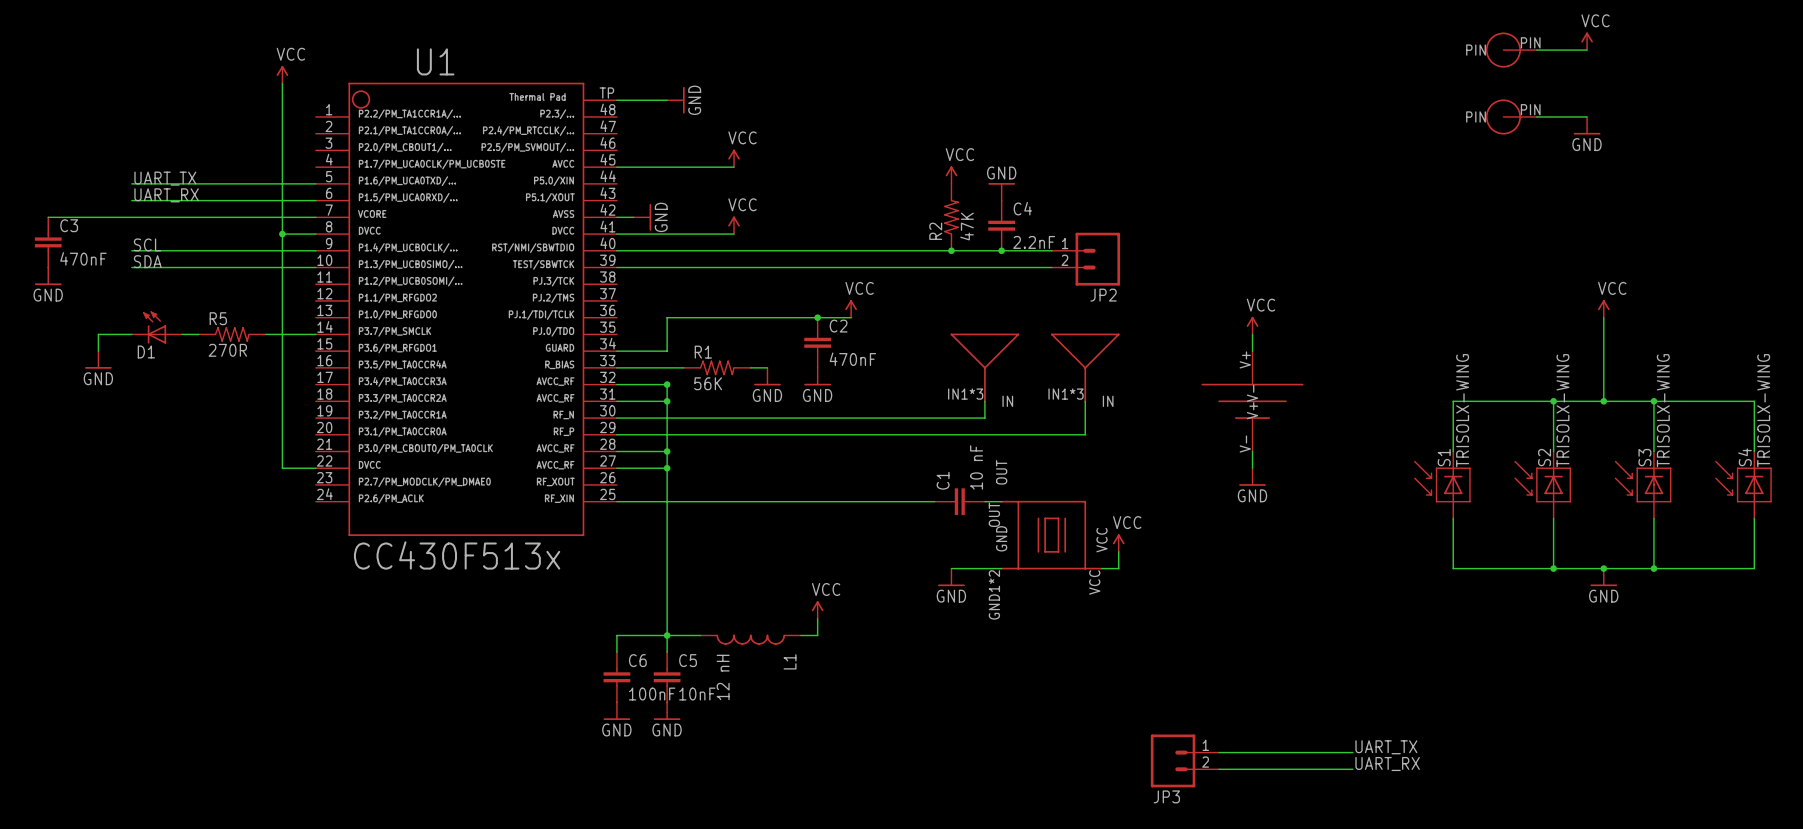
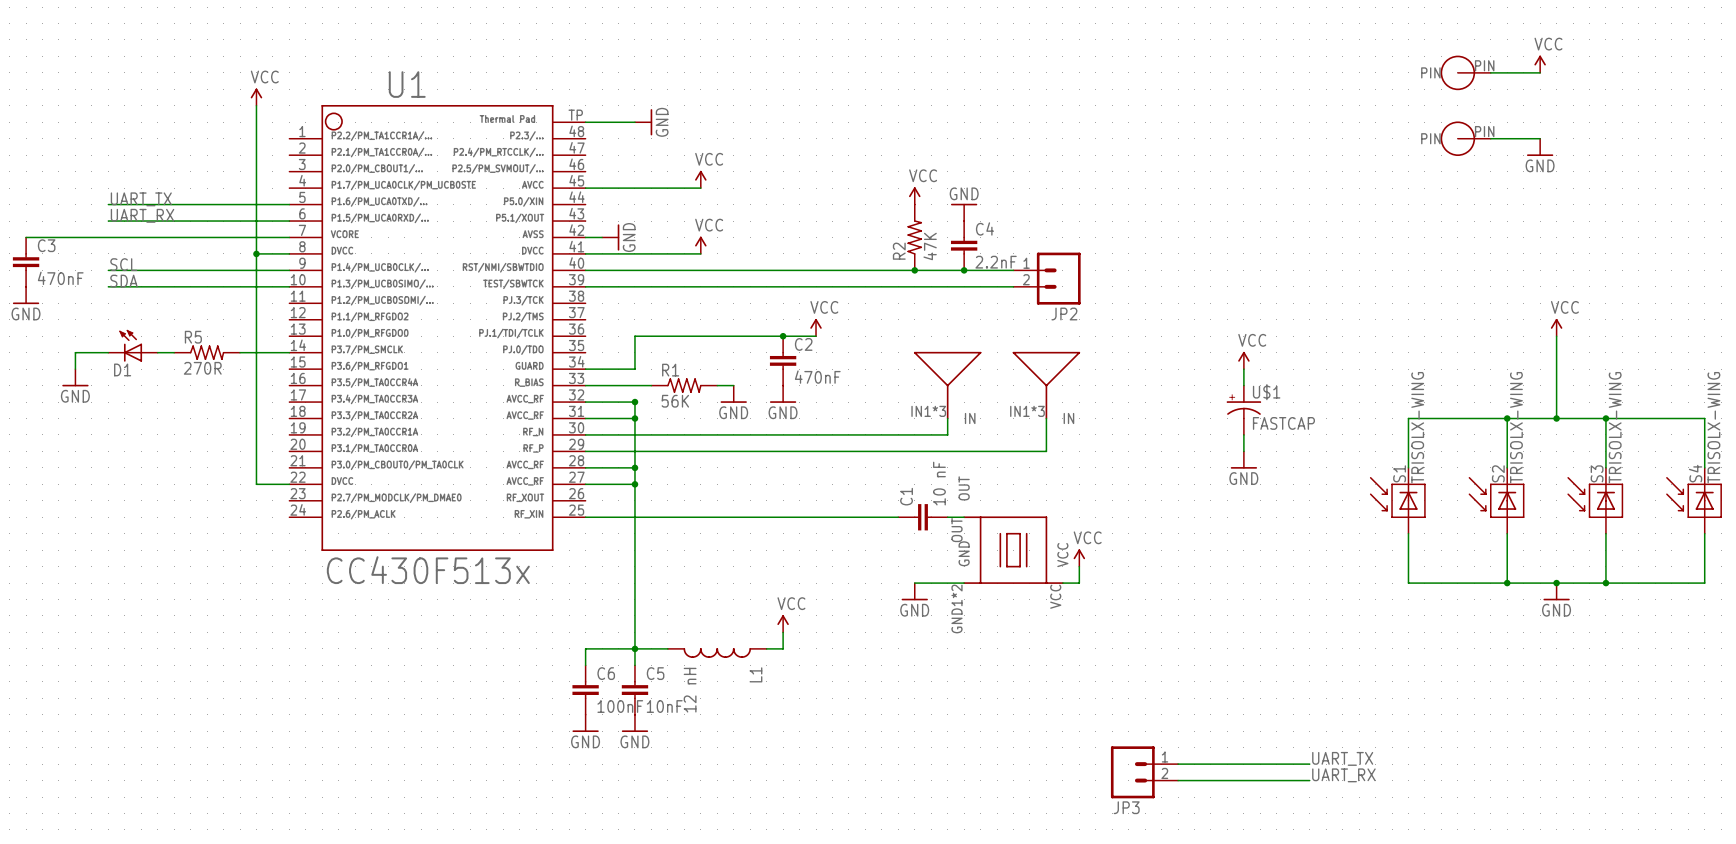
power symbol position: VCC (1252, 325) -> VCC (1243, 360)
wire: (1252, 334) (1252, 351) -> (1243, 369) (1243, 385)
U$1: none -> FASTCAP (1243, 410)
part: (1252, 401) -> none
wire: (1252, 451) (1252, 468) -> (1243, 434) (1243, 451)
power symbol position: GND (1252, 477) -> GND (1243, 460)

